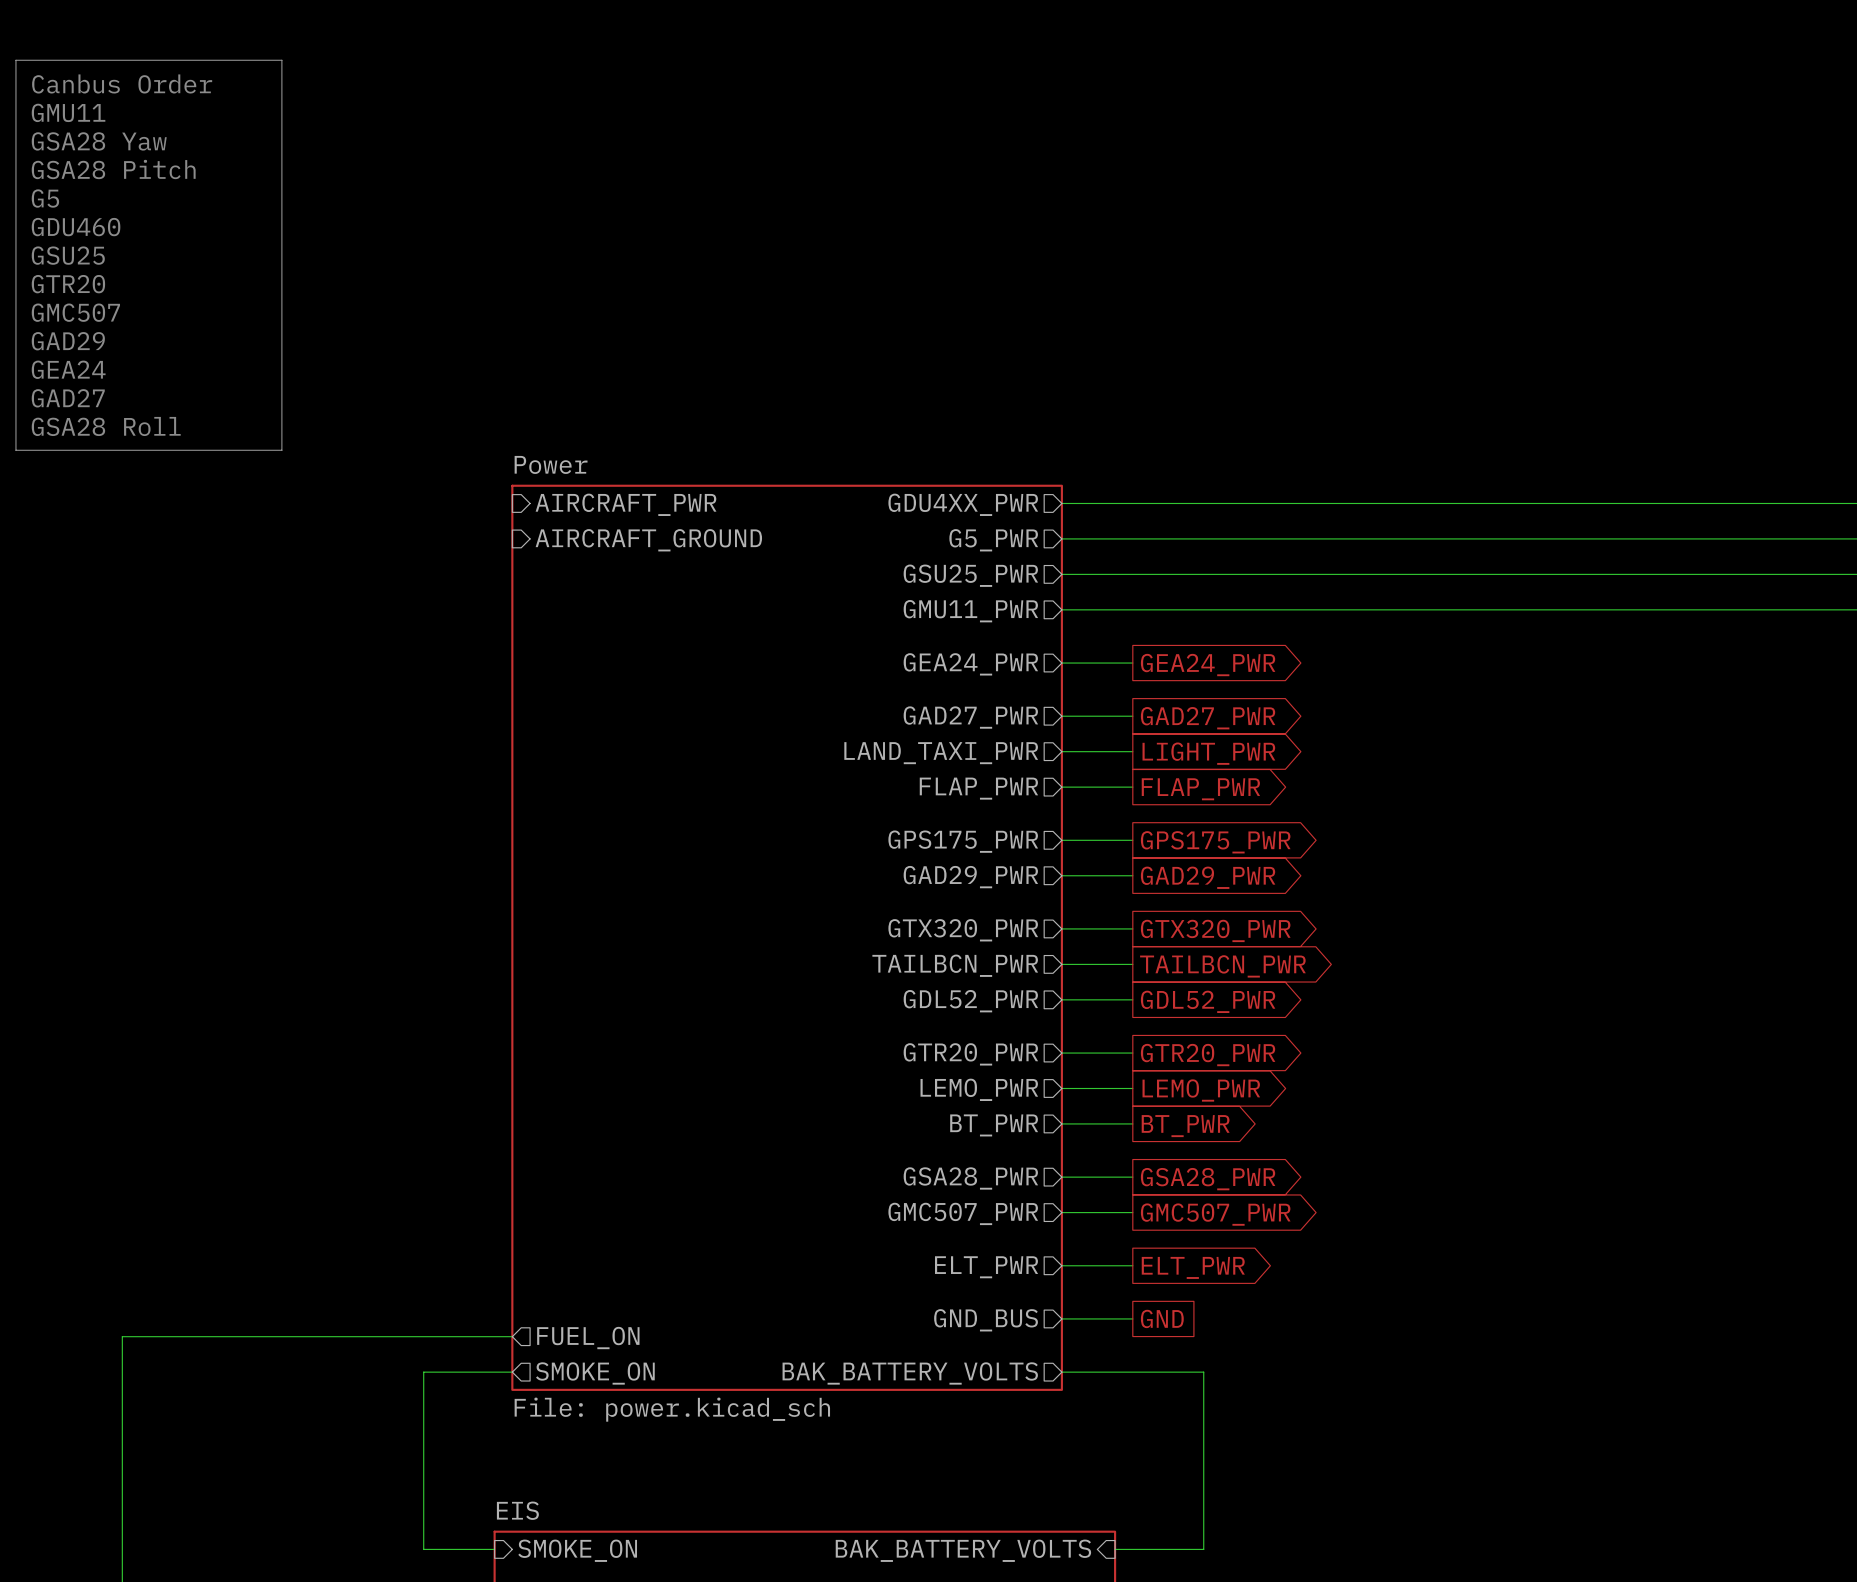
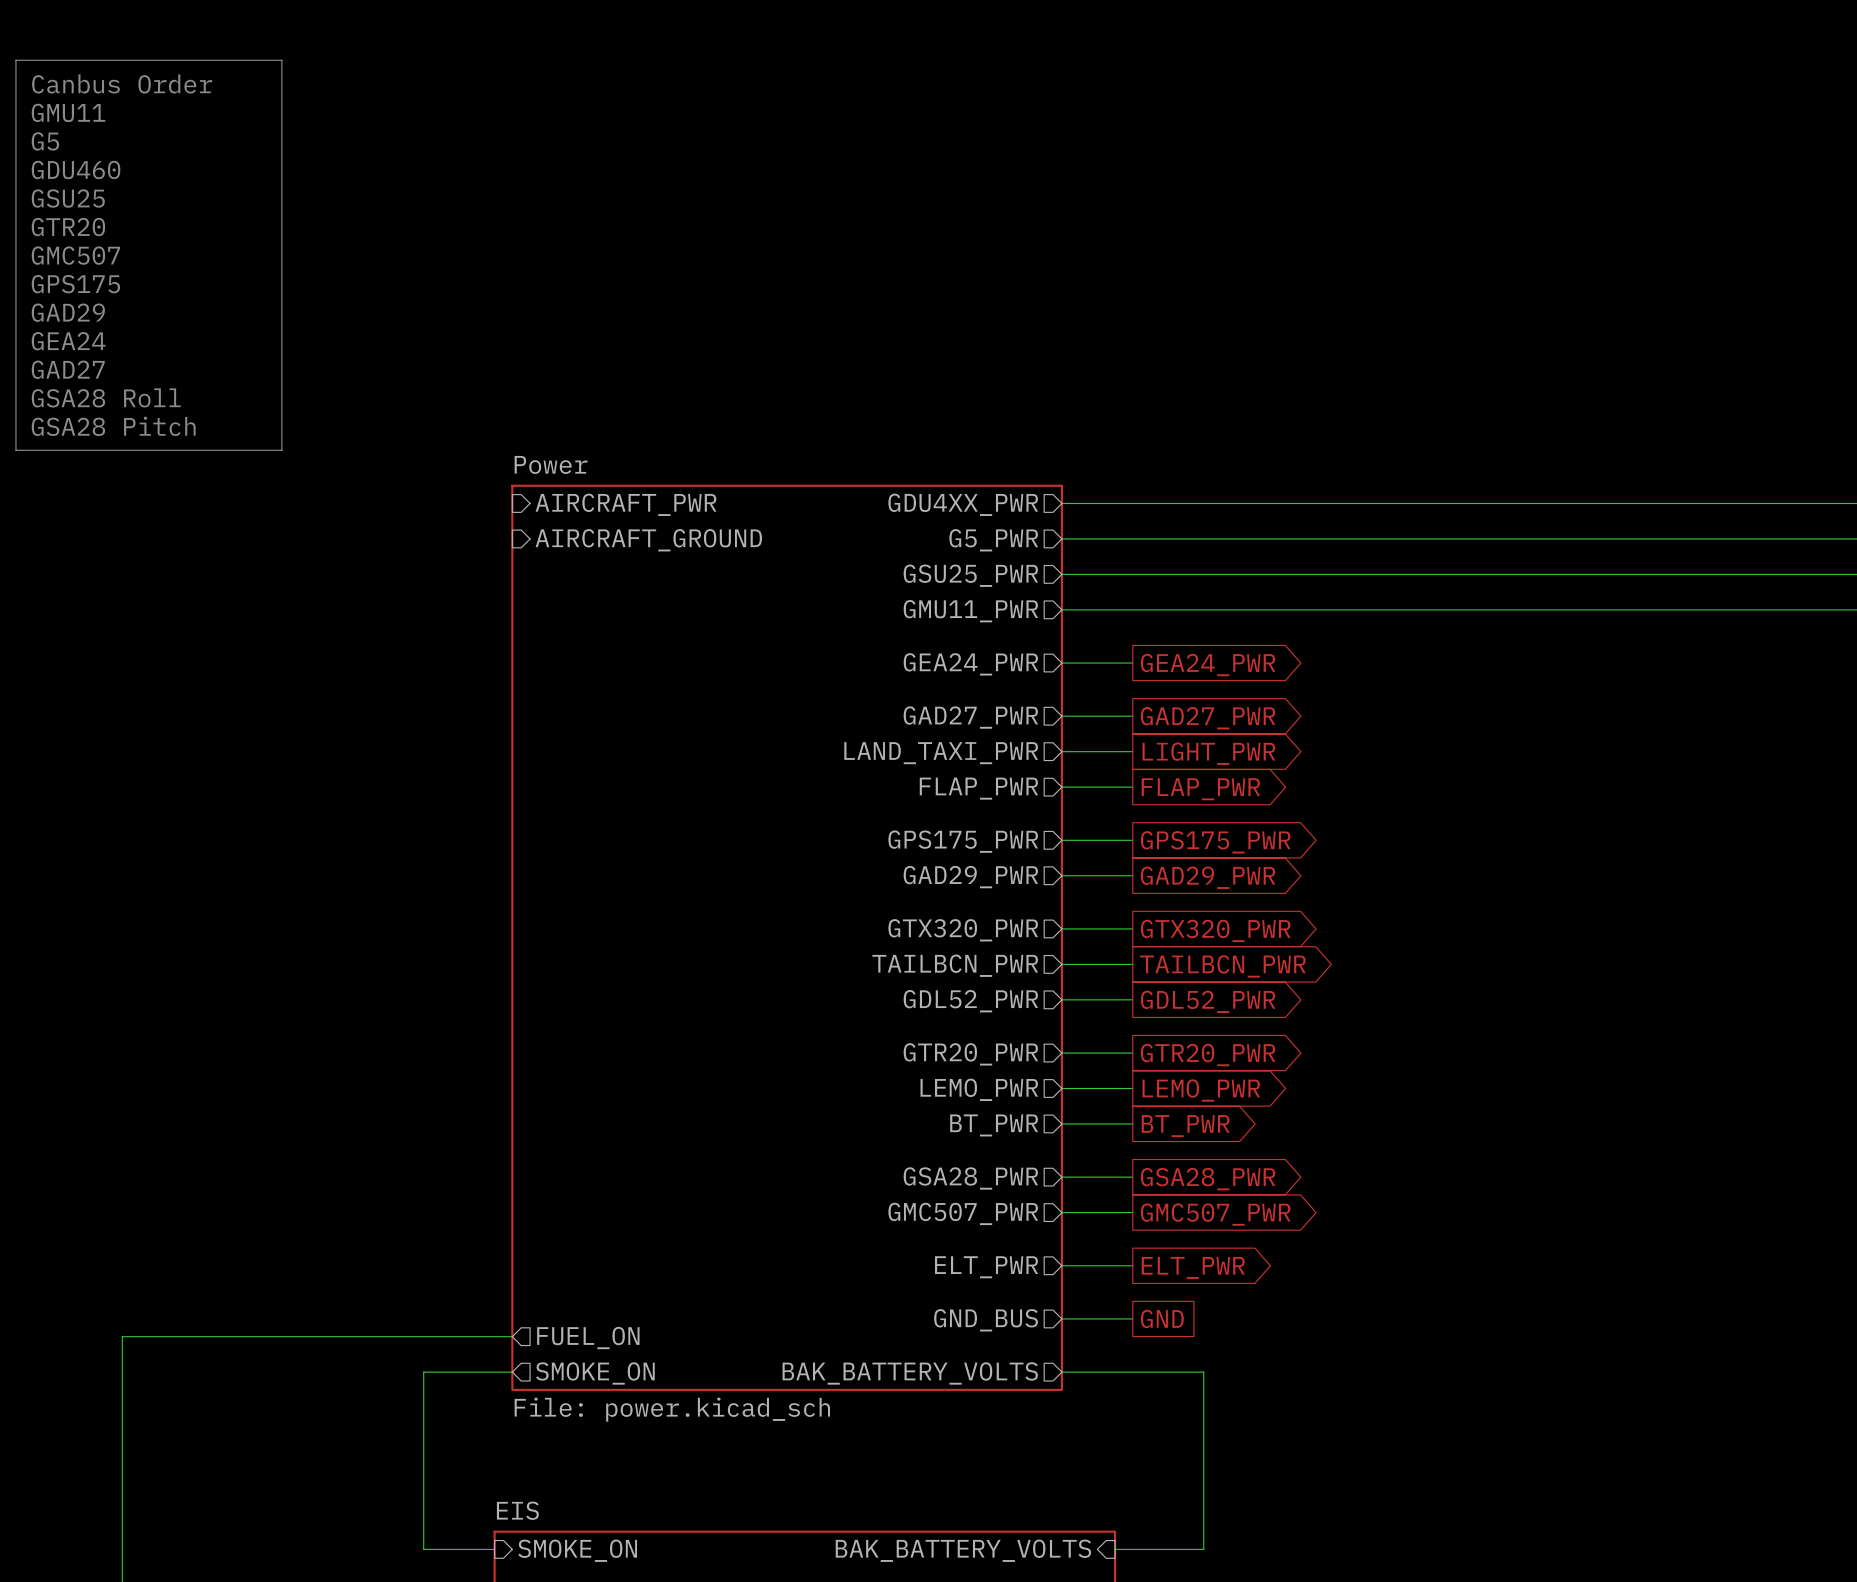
text: GSA28 Yaw (99, 141) -> G5 (45, 141)
text: GSA28 Pitch (113, 169) -> GDU460 (76, 169)
text: G5 (45, 198) -> GSU25 (68, 198)
text: GDU460 (76, 227) -> GTR20 (68, 227)
text: GSU25 (68, 255) -> GMC507 (75, 255)
text: GTR20 (68, 284) -> GPS175 (75, 284)
text: GMC507 (75, 312) -> GAD29 (68, 312)
text: GAD29 (68, 341) -> GEA24 (68, 341)
text: GEA24 (68, 369) -> GAD27 (68, 369)
text: GAD27 (68, 398) -> GSA28 Roll (106, 397)
text: GSA28 Roll (106, 426) -> GSA28 Pitch (113, 426)

